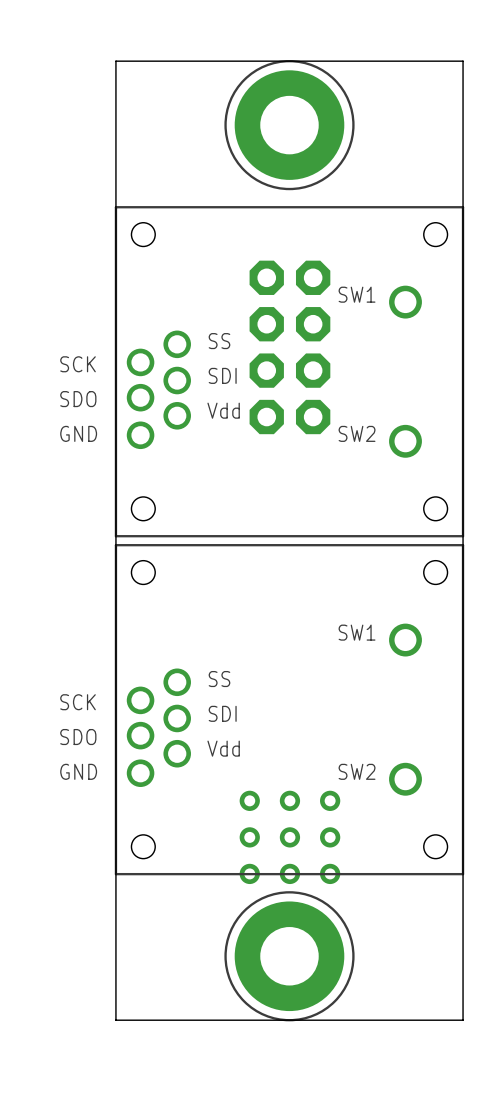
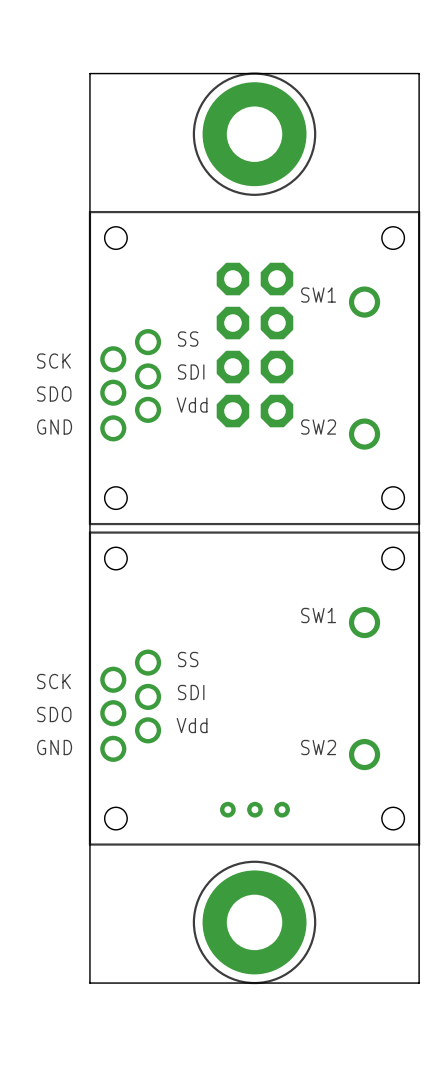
part footprint: [239, 790, 341, 885] -> [219, 801, 290, 818]

